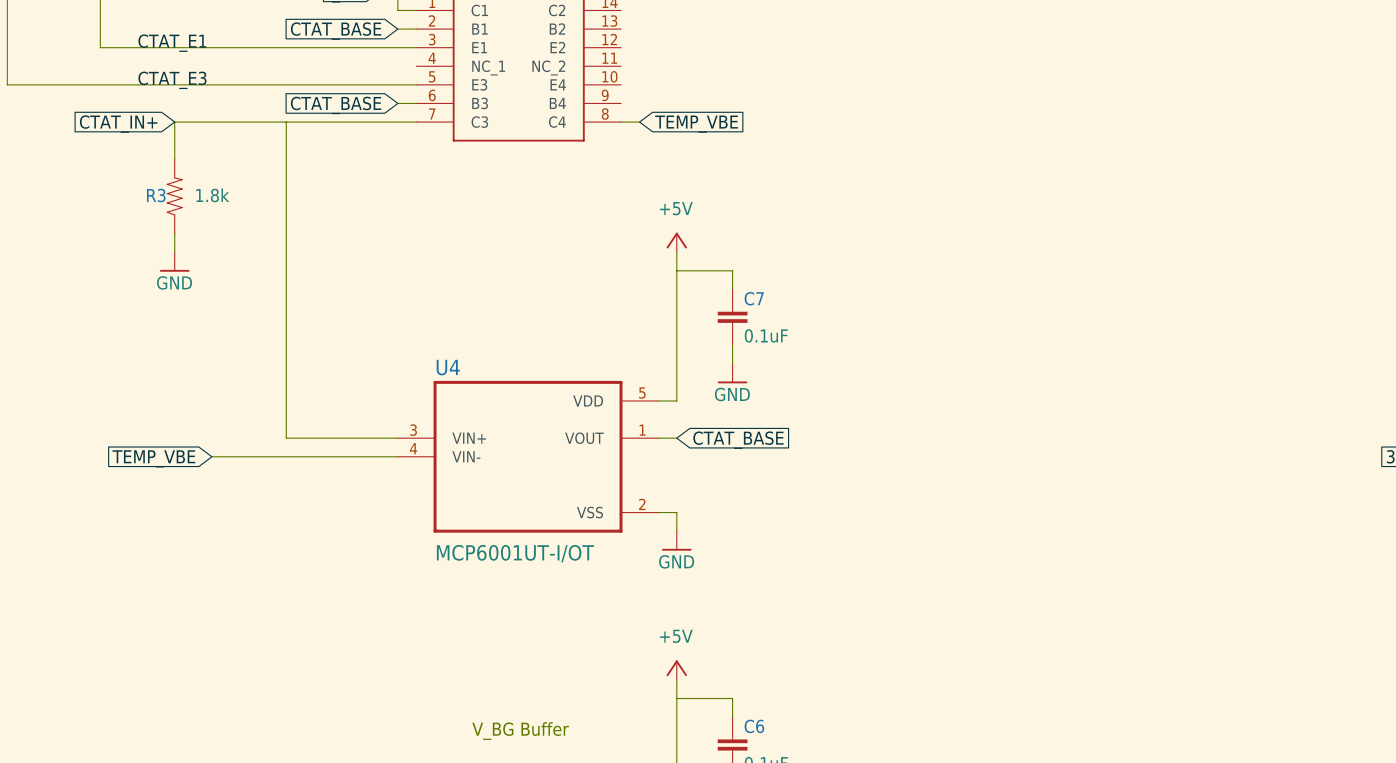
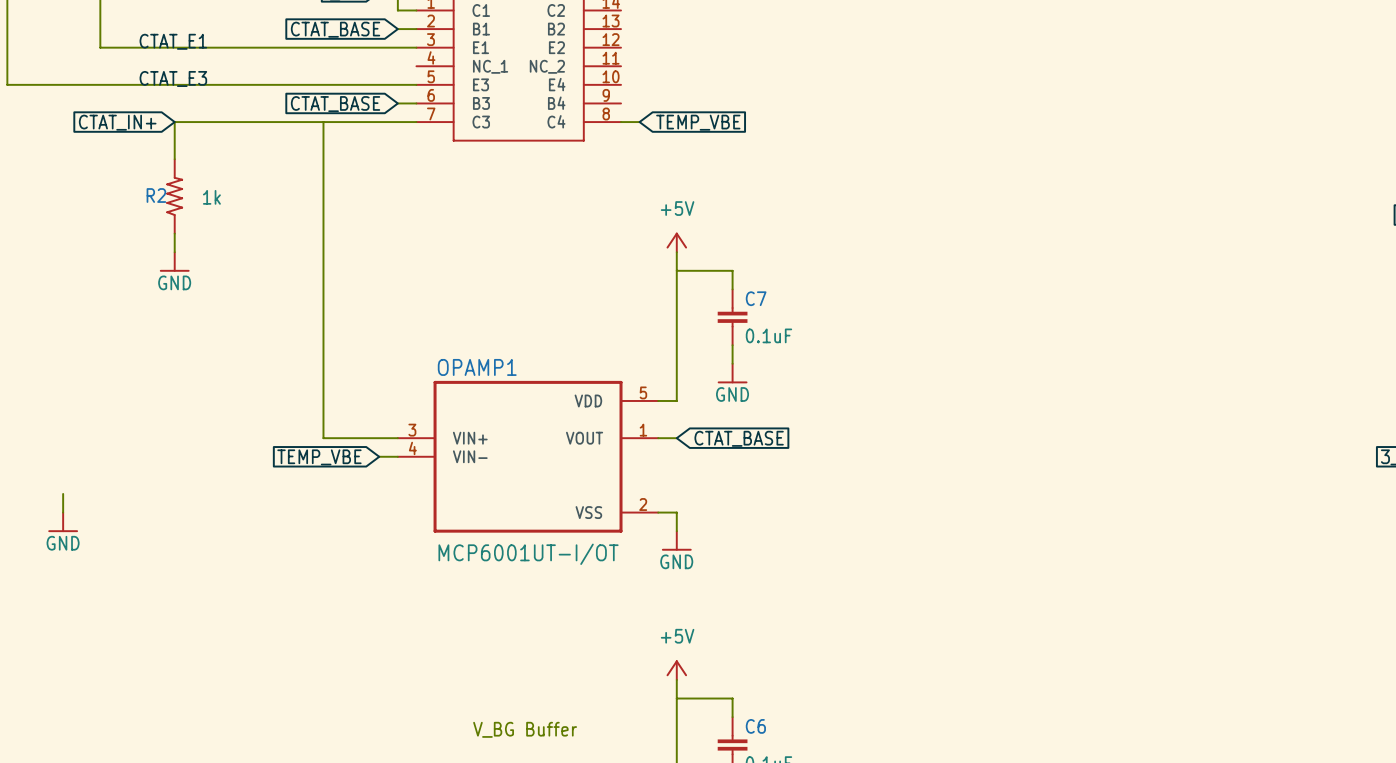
wire: (286, 122) (286, 438) (323, 438) -> (323, 122) (323, 438)
R3 name: R3 (156, 195) -> R2 (156, 195)
R3 value: 1.8k (212, 195) -> 1k (211, 197)
U4 name: U4 (448, 367) -> OPAMP1 (477, 367)
wire: (211, 456) (379, 456) -> none
global label position: TEMP_VBE (153, 458) -> TEMP_VBE (319, 457)
wire: none -> (63, 493) (63, 512)
power symbol: none -> GND (63, 522)

